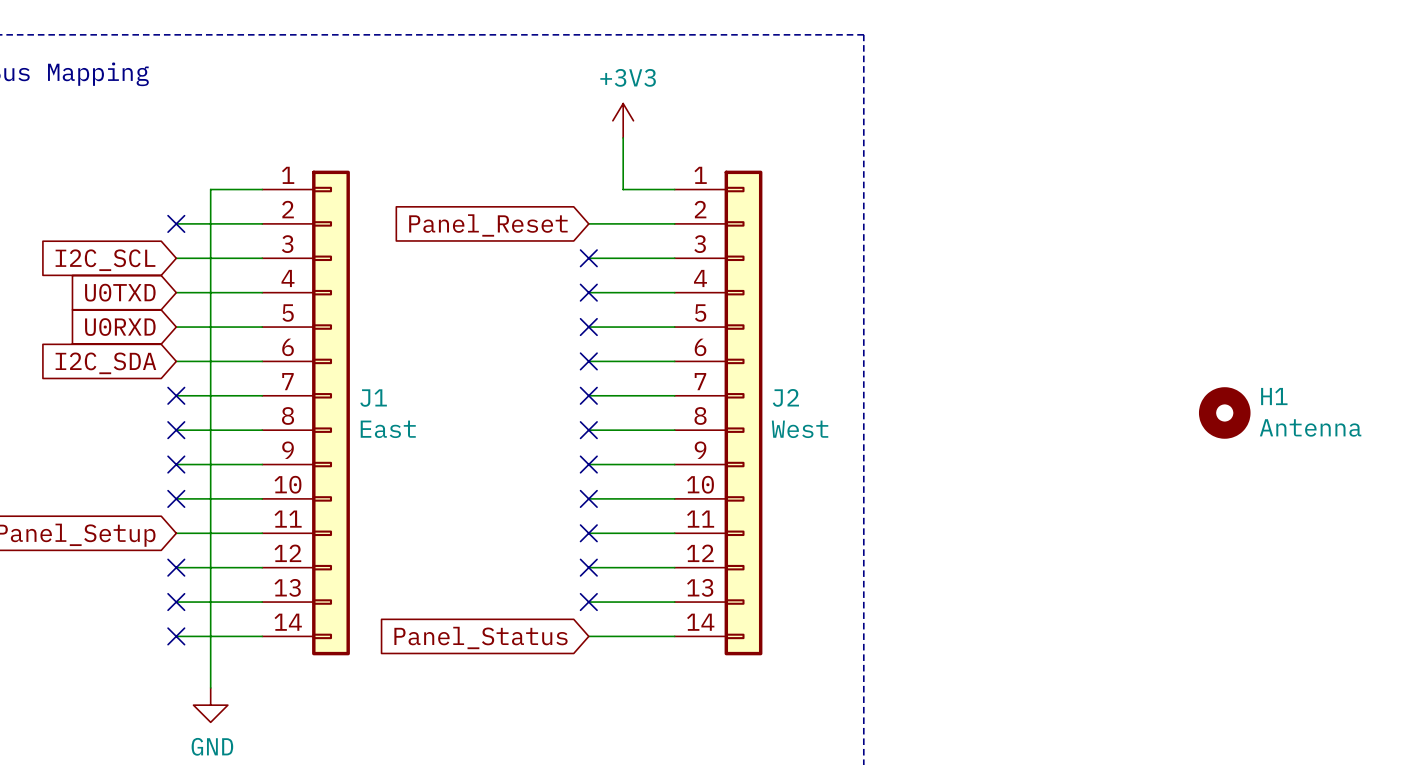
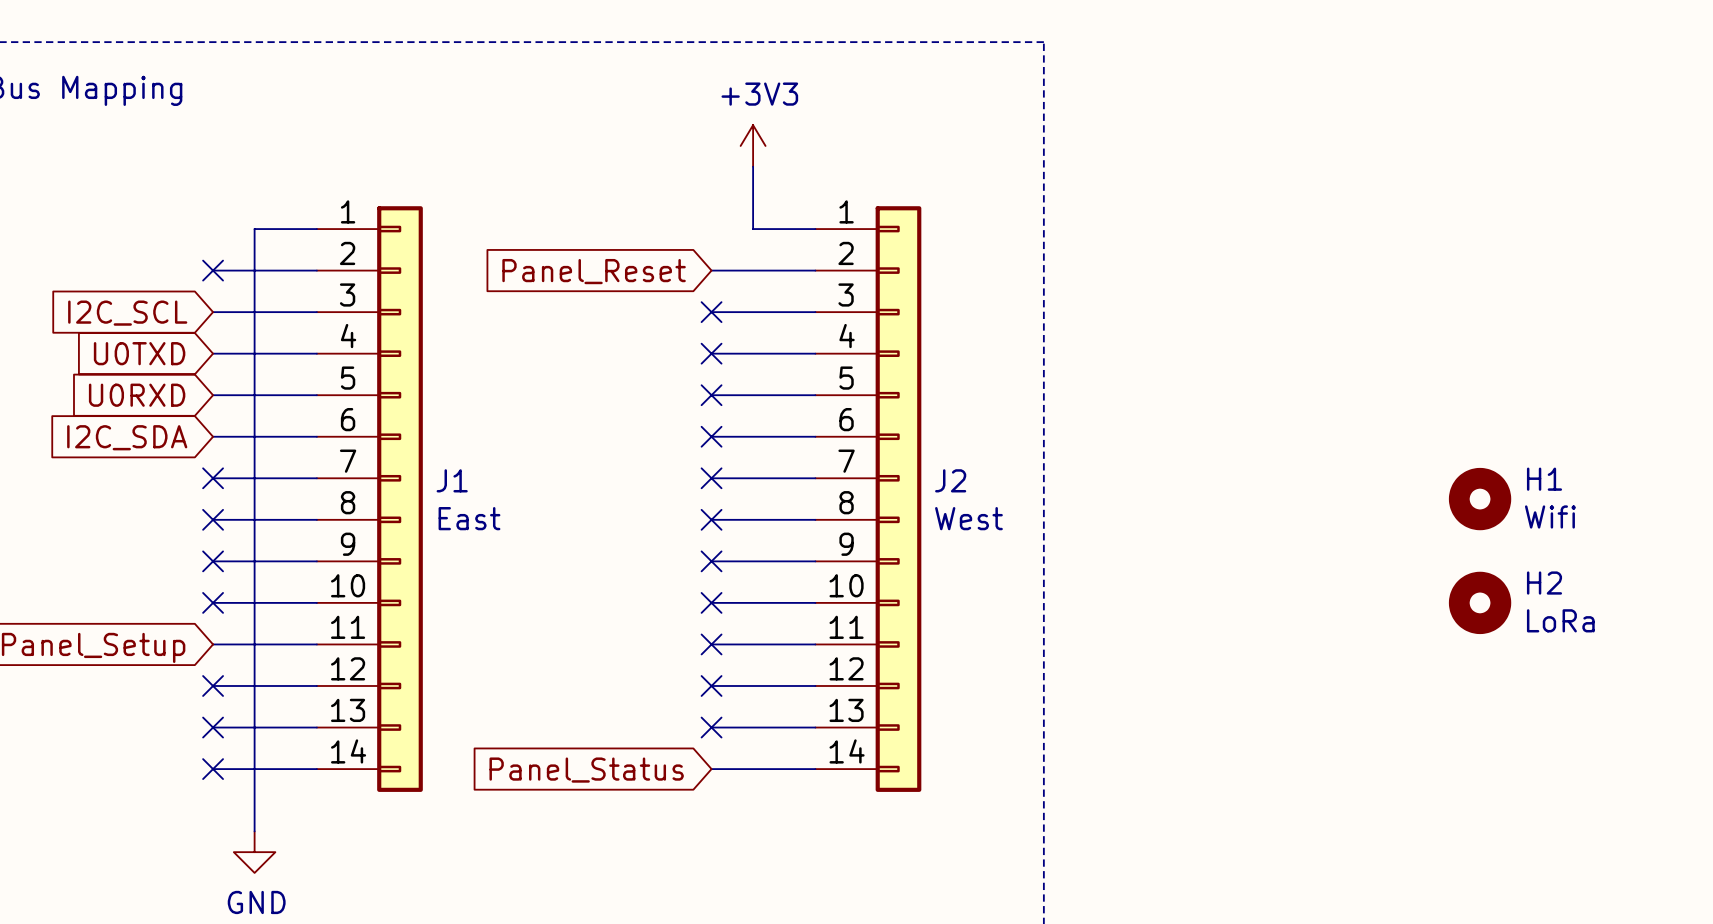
H1 value: Antenna (1310, 427) -> Wifi (1550, 516)
H2: none -> LoRa (1480, 602)

